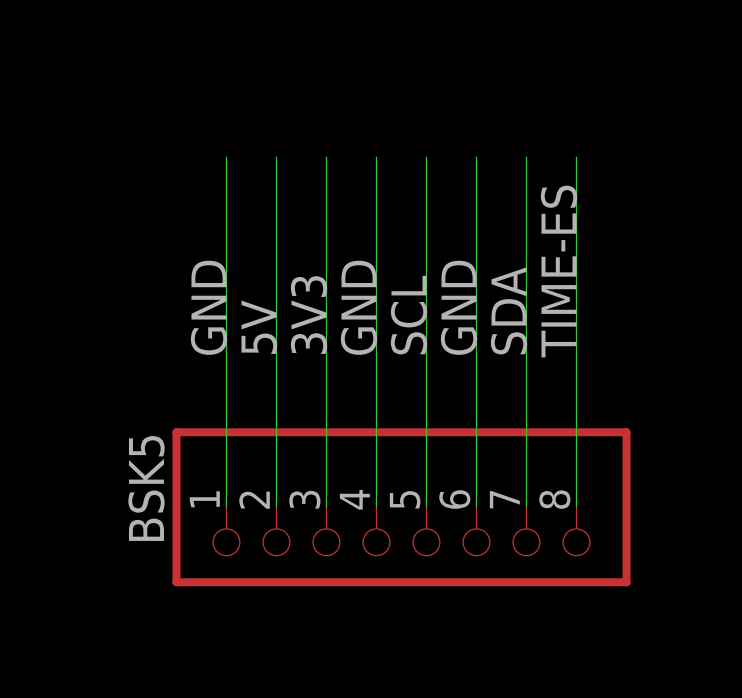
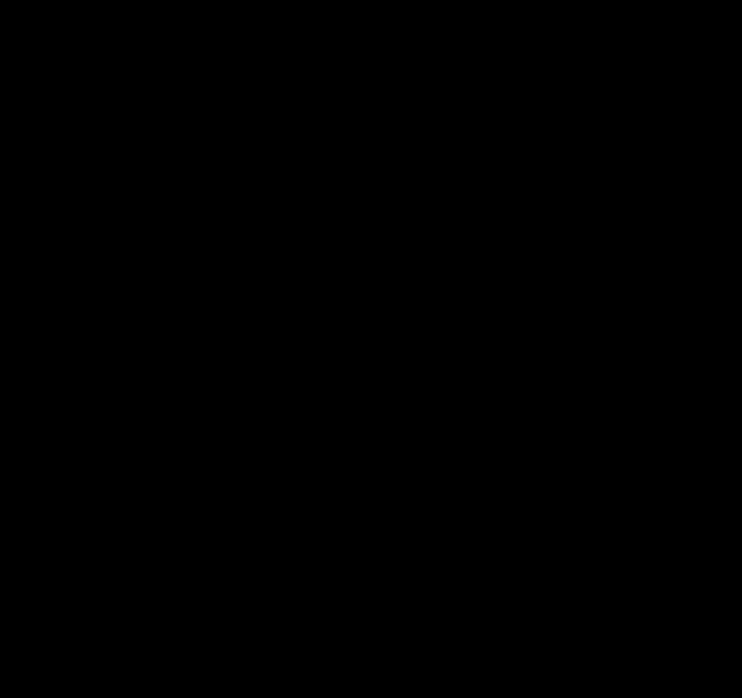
wire: (226, 157) (226, 507) -> none
wire: (276, 157) (276, 507) -> none
wire: (326, 157) (326, 507) -> none
wire: (376, 157) (376, 507) -> none
wire: (426, 157) (426, 507) -> none
wire: (476, 157) (476, 507) -> none
wire: (526, 157) (526, 507) -> none
wire: (576, 157) (576, 507) -> none
label: TIME-ES (559, 271) -> none
label: GND (209, 307) -> none
label: GND (359, 307) -> none
label: GND (459, 307) -> none
label: SDA (509, 310) -> none
label: 3V3 (309, 315) -> none
label: SCL (409, 315) -> none
label: 5V (259, 327) -> none
BSK5: (401, 507) -> none

